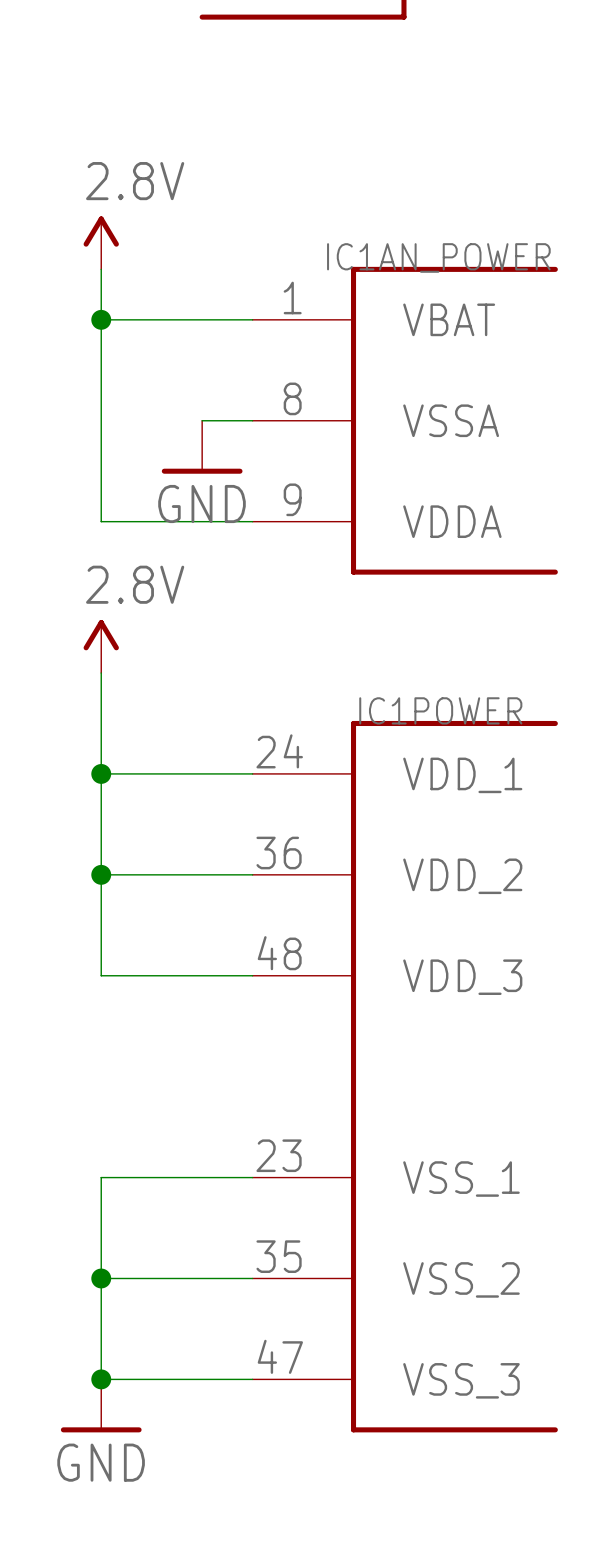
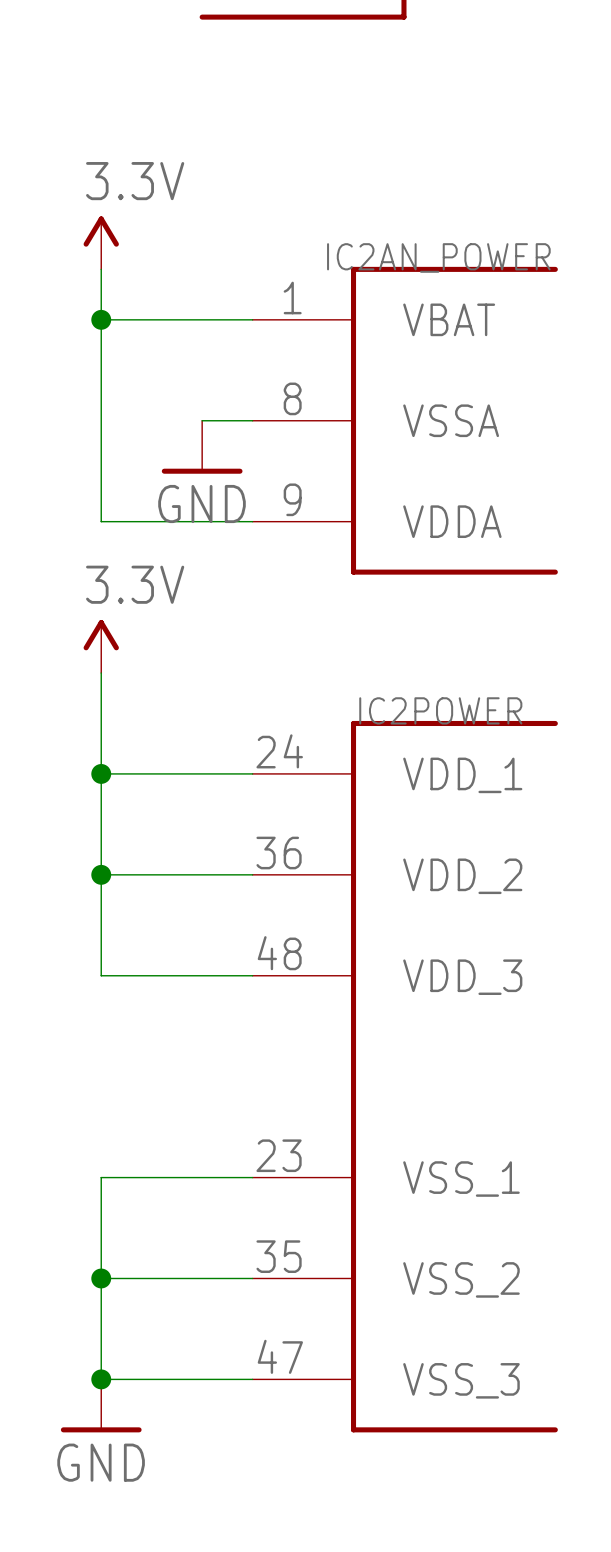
power symbol: 2.8V (101, 242) -> 3.3V (101, 242)
IC1AN_POWER name: IC1AN_POWER (438, 257) -> IC2AN_POWER (438, 257)
power symbol: 2.8V (101, 646) -> 3.3V (101, 646)
IC1POWER name: IC1POWER (440, 710) -> IC2POWER (440, 710)

